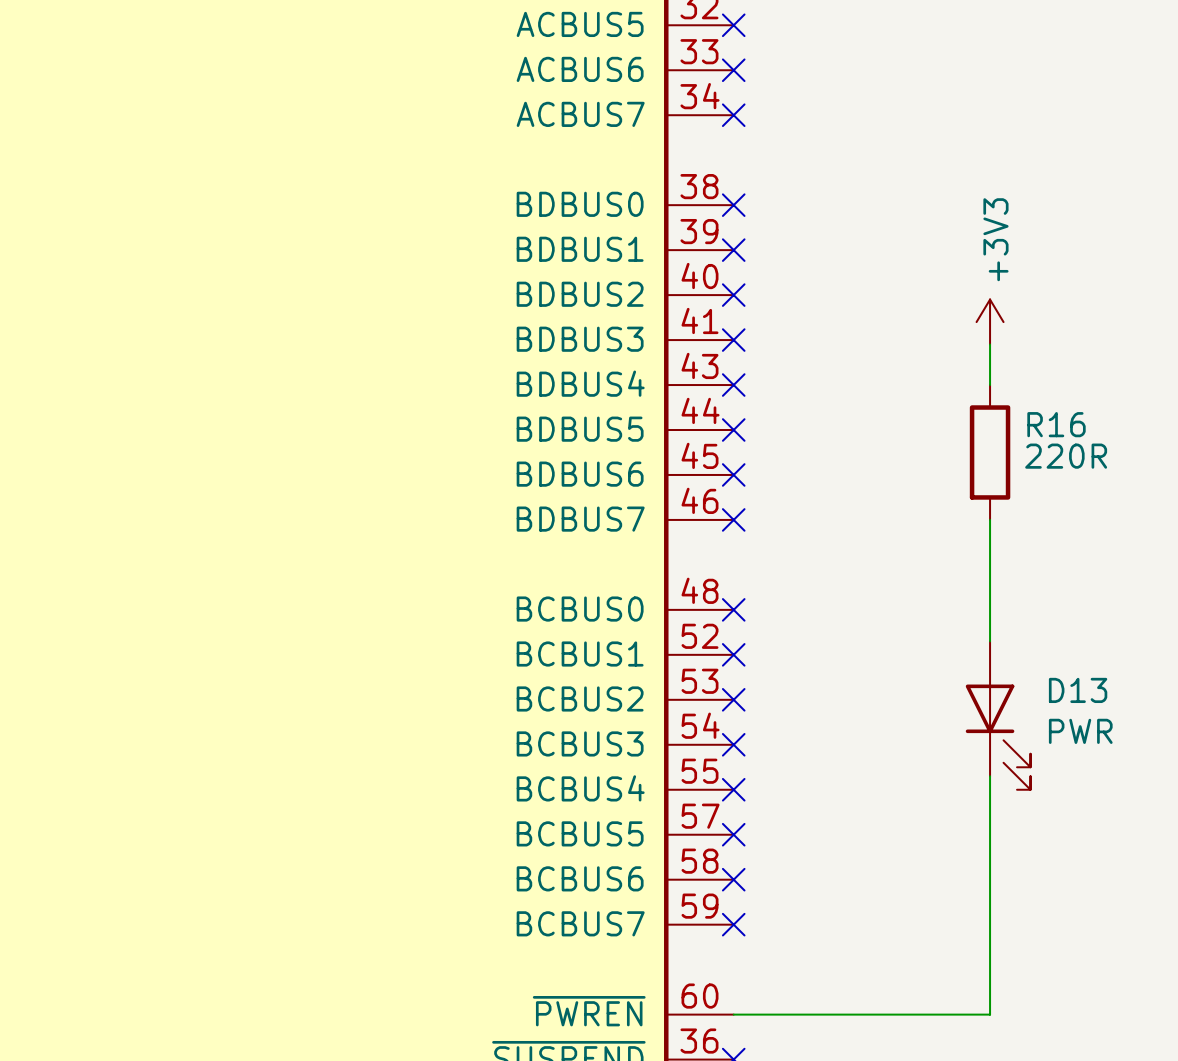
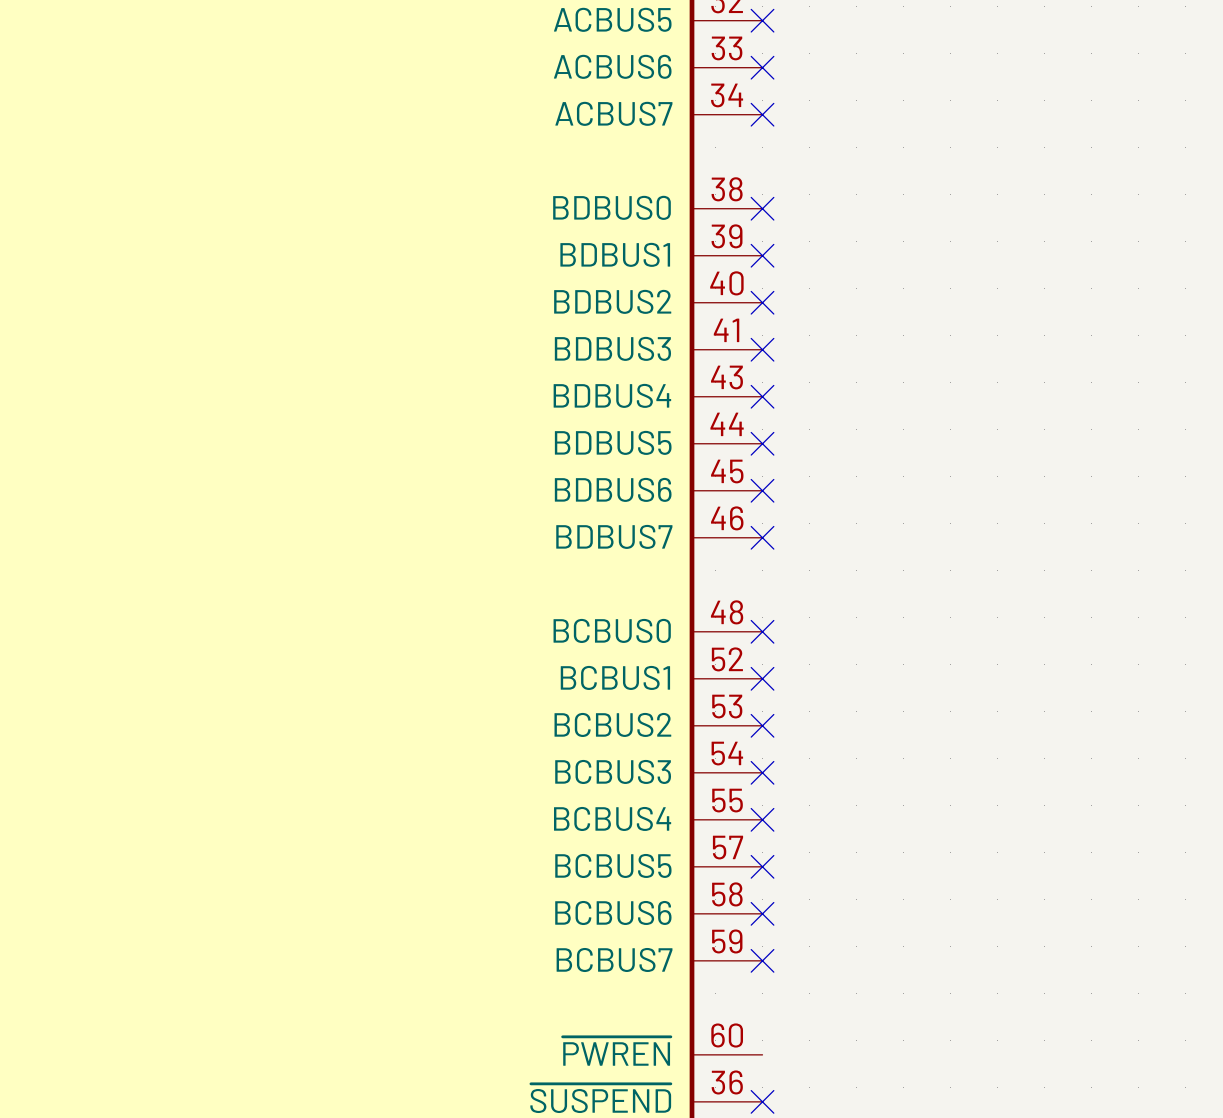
power symbol: +3V3 (990, 322) -> none
wire: (990, 344) (990, 385) -> none
R16: 220R (990, 452) -> none
wire: (990, 519) (990, 641) -> none
D13: PWR (998, 715) -> none
wire: (990, 776) (990, 1014) (733, 1014) -> none

